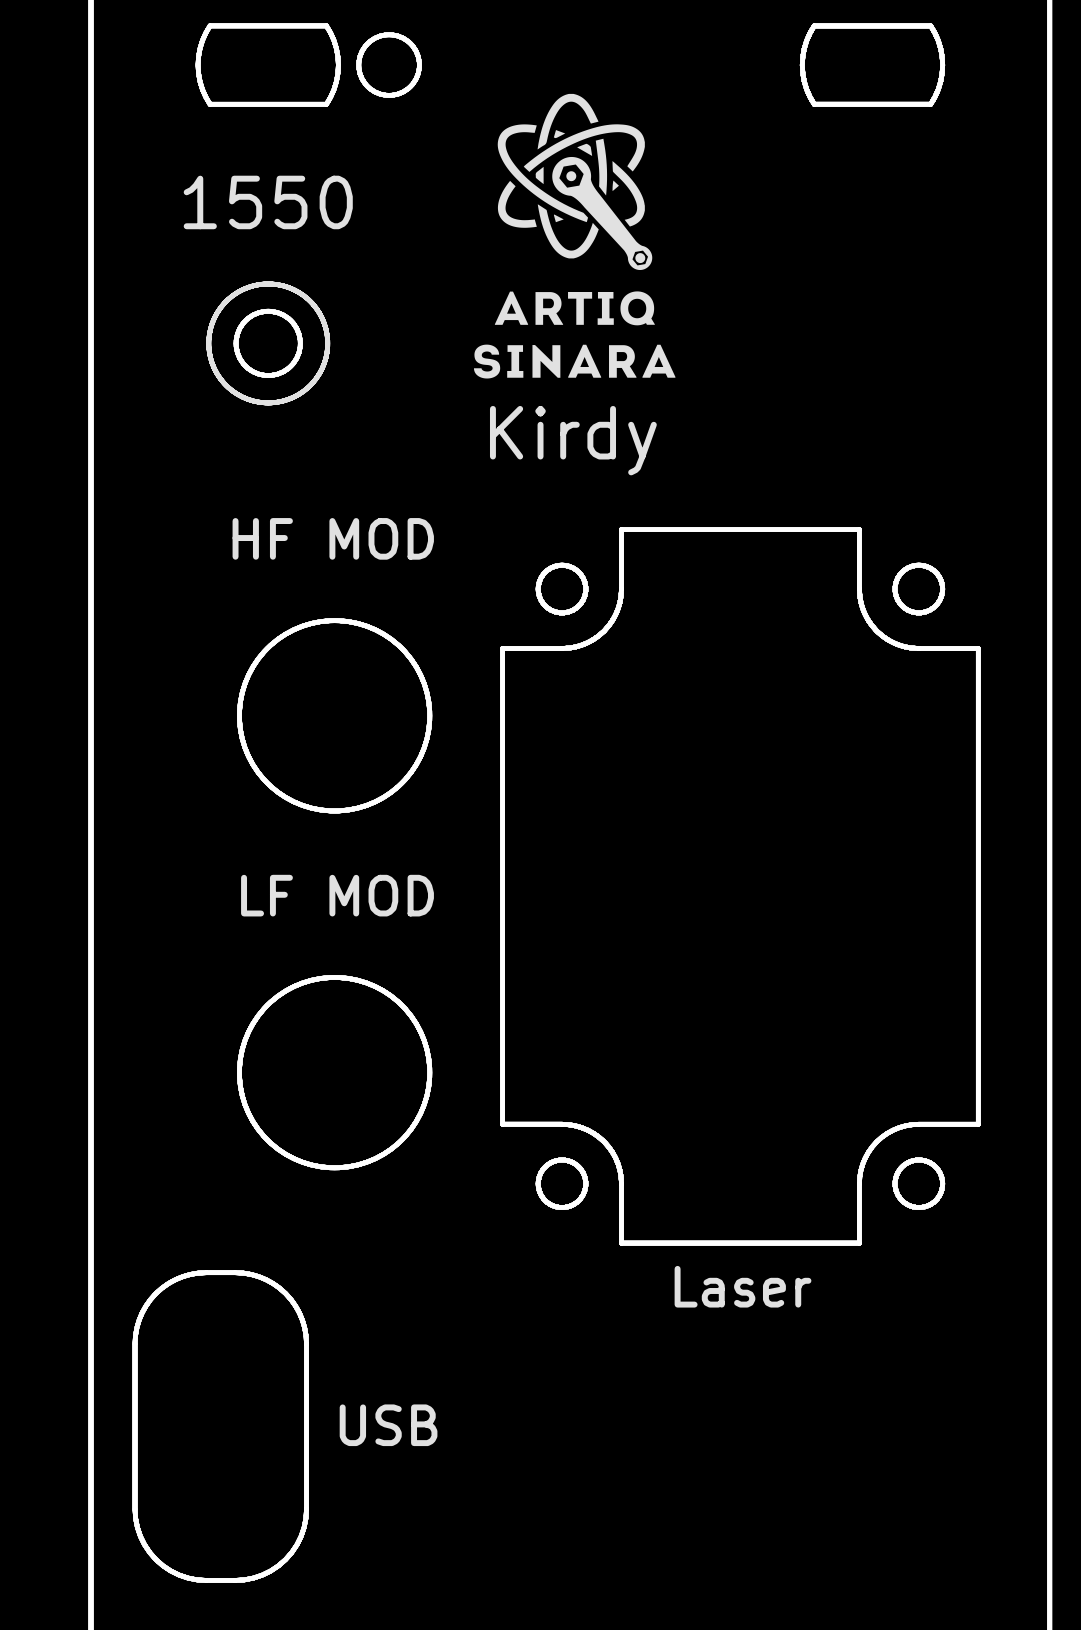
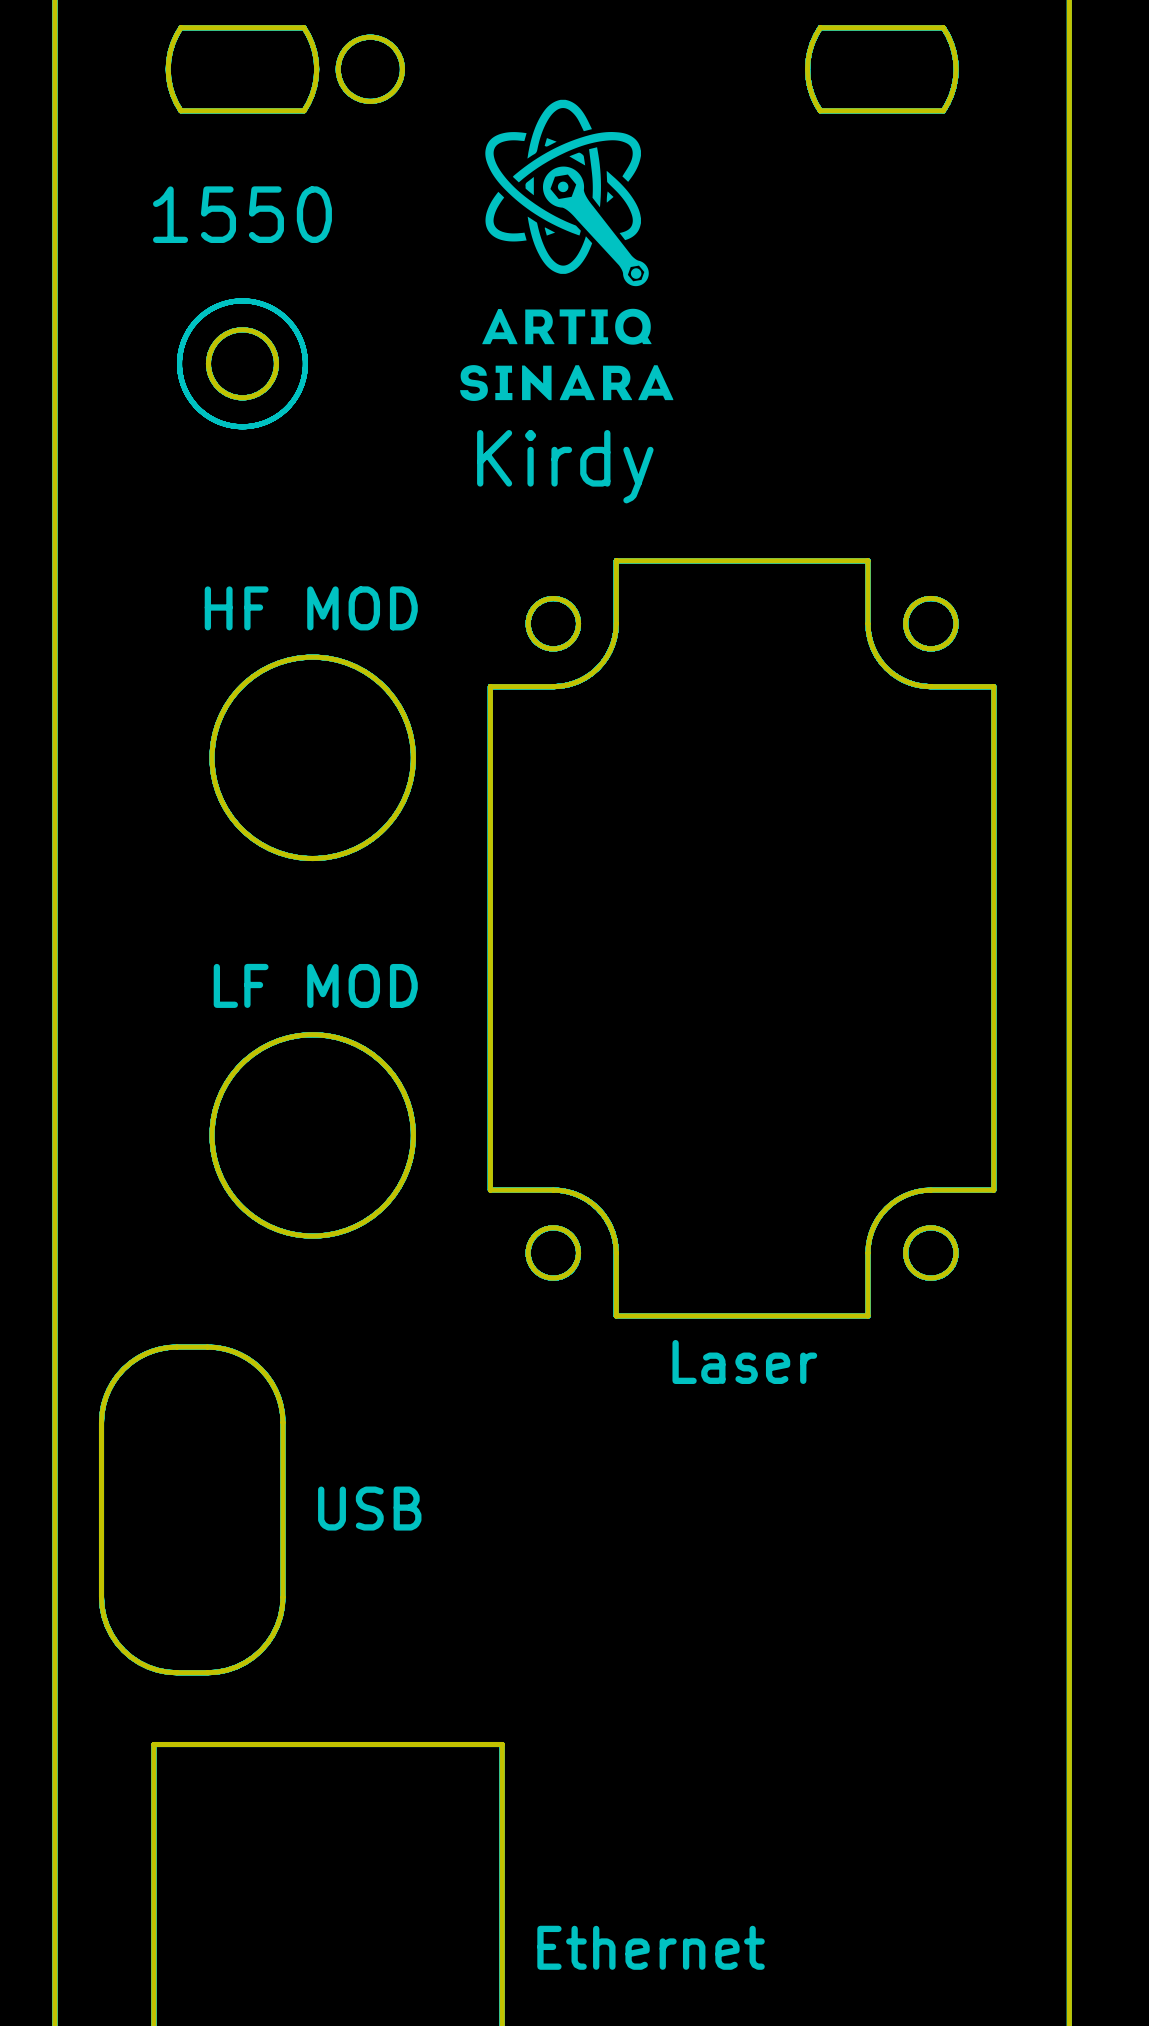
text position: HF (262, 538) -> HF (236, 608)
text position: MOD (381, 538) -> MOD (362, 608)
text position: LF (266, 895) -> LF (241, 985)
text position: MOD (381, 895) -> MOD (362, 985)

